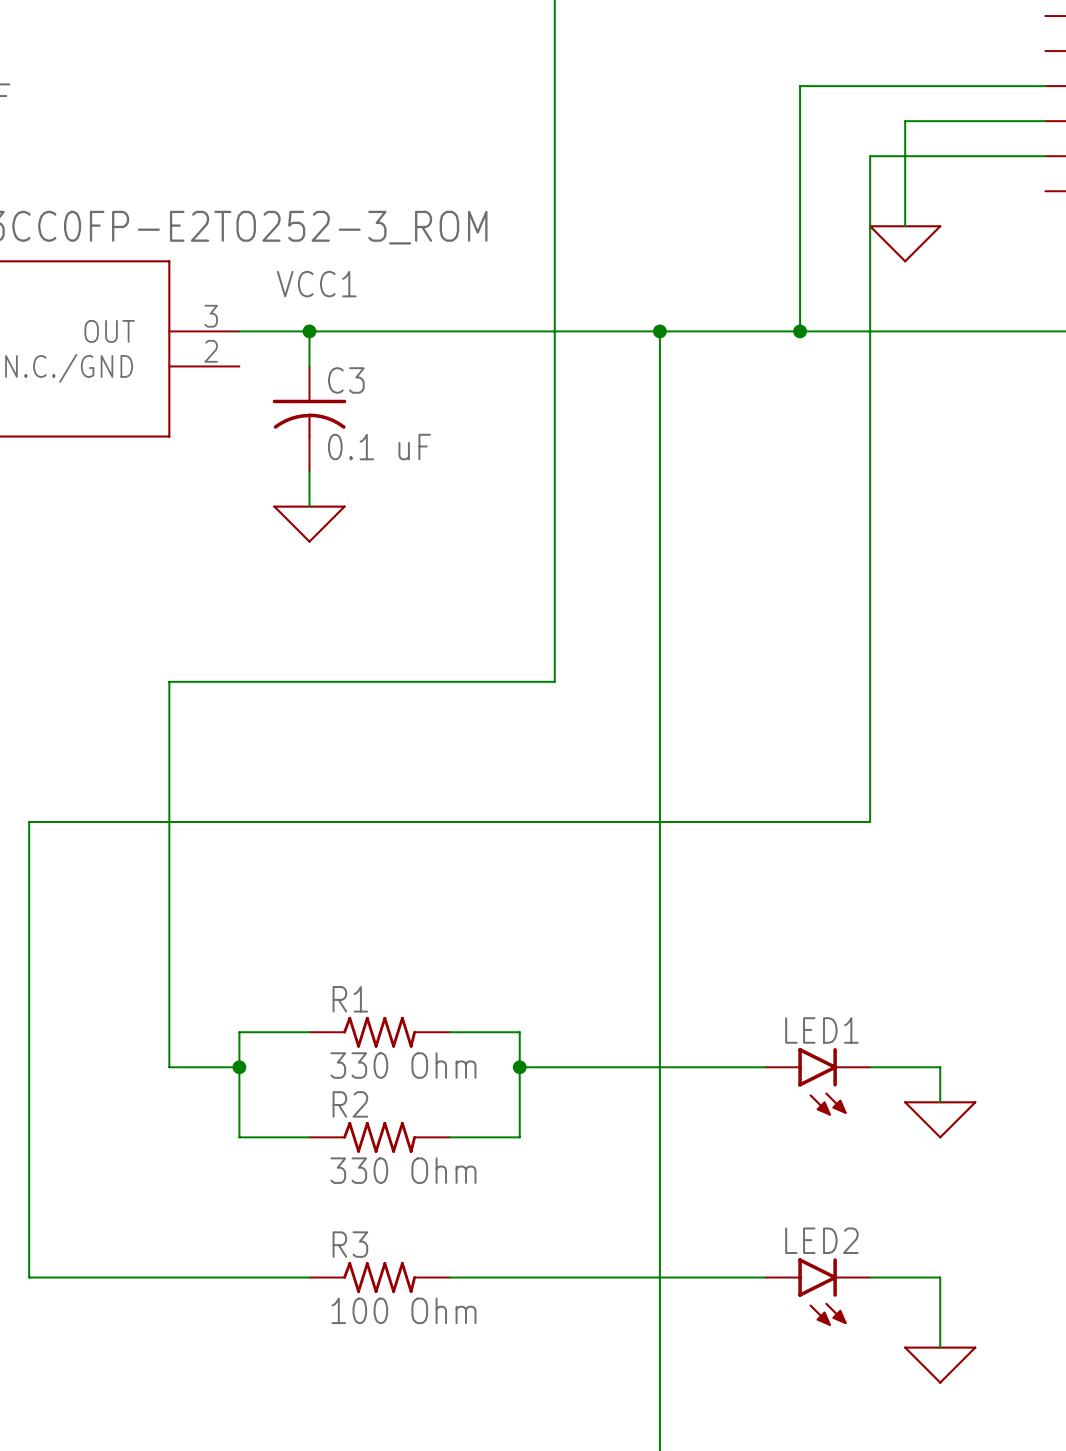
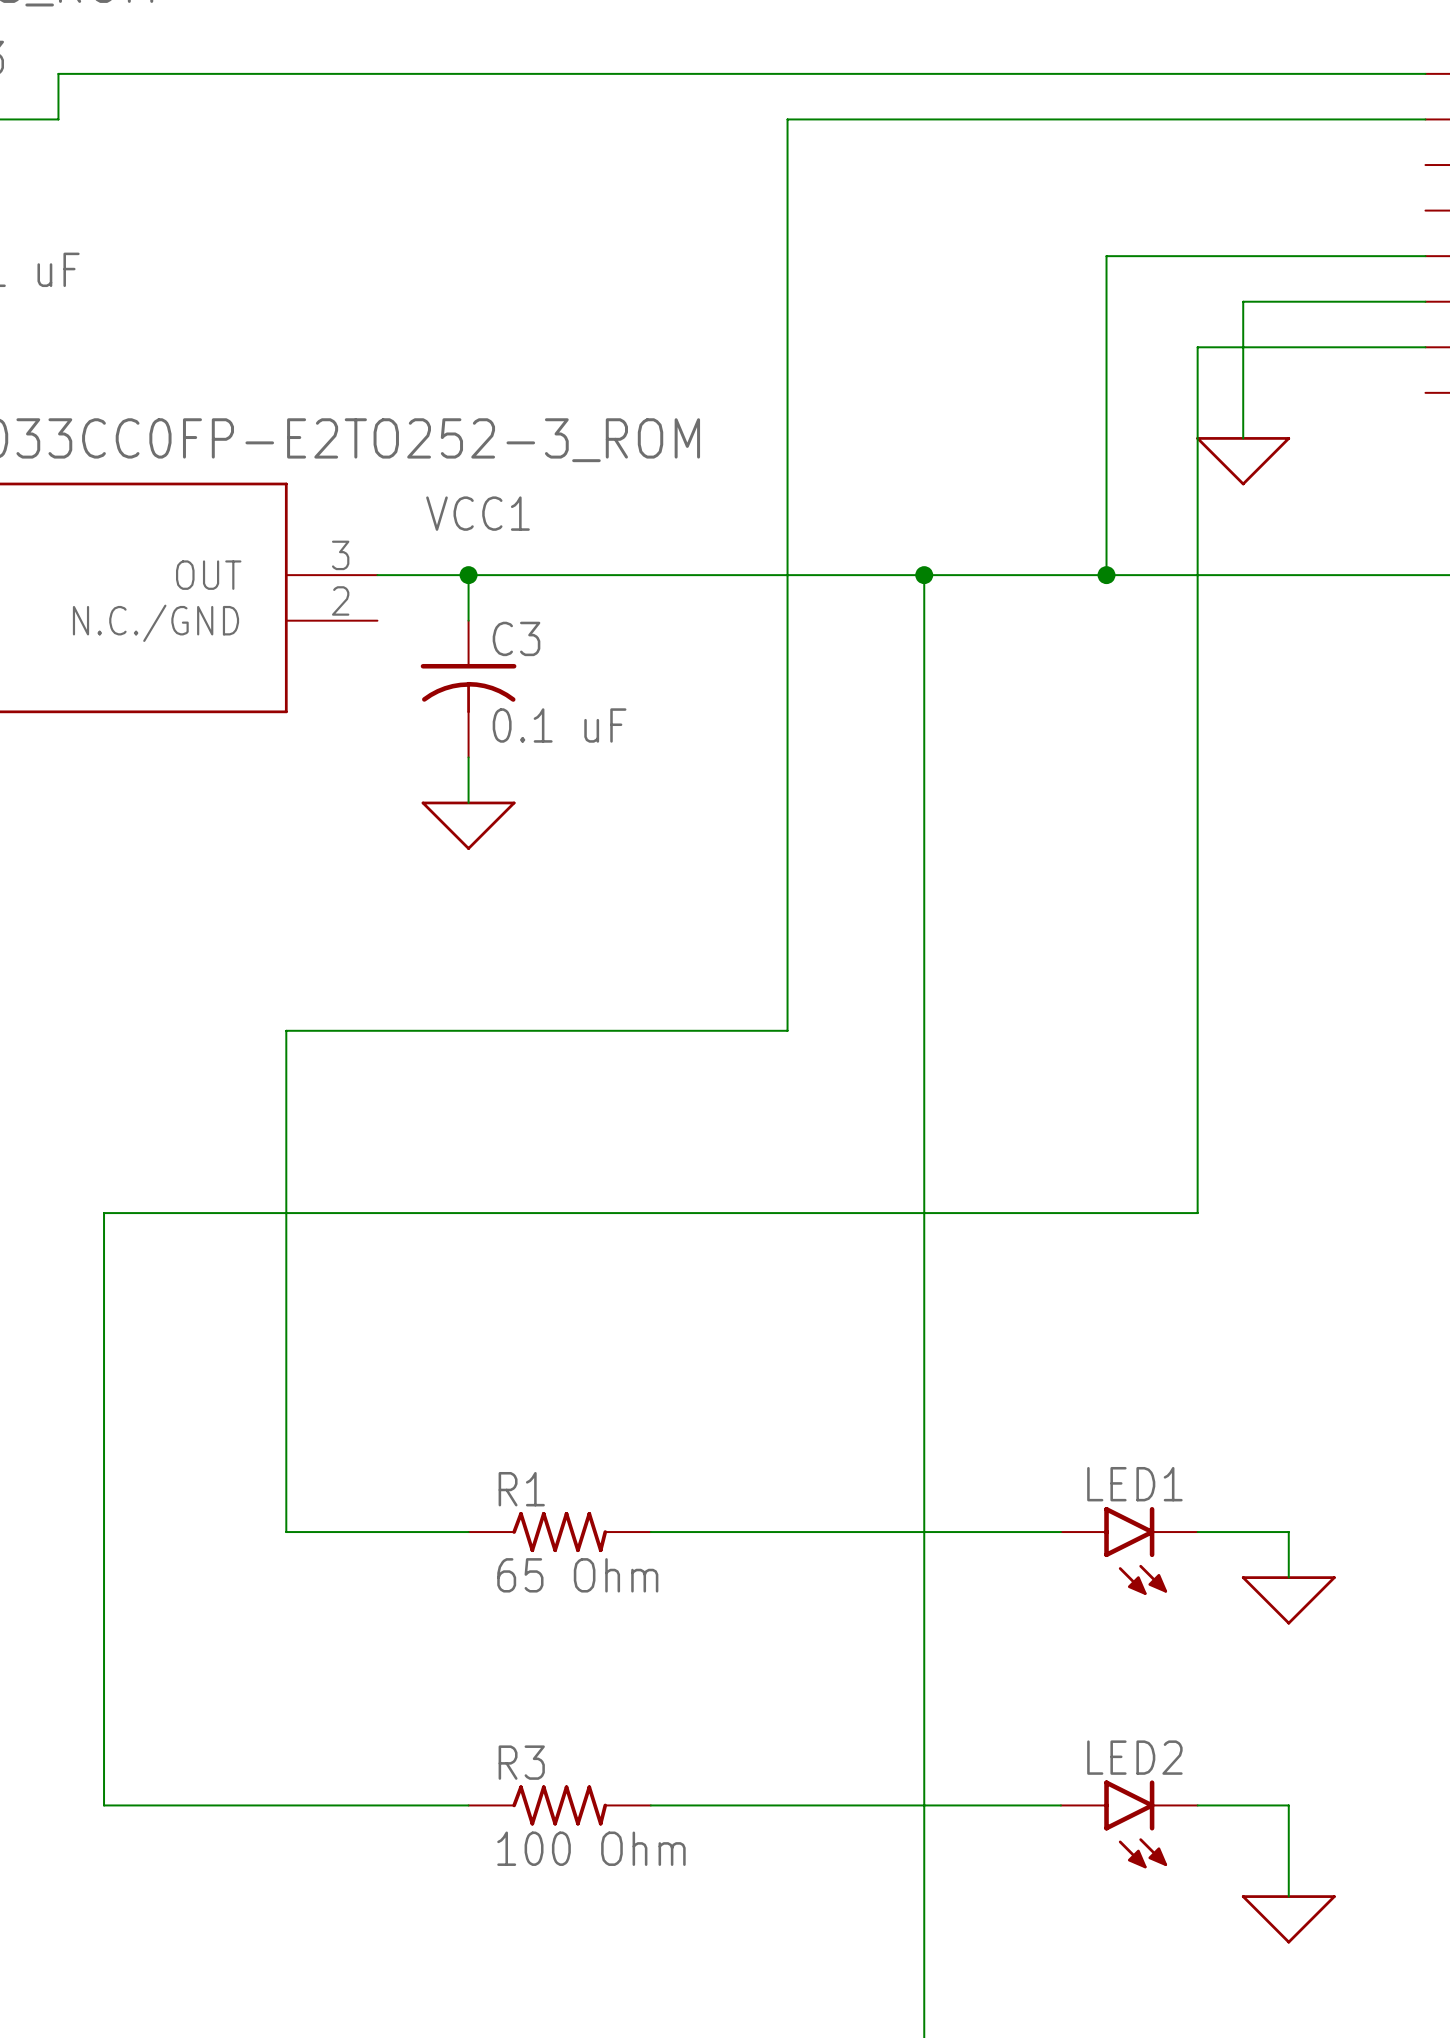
wire: (309, 1032) (239, 1032) (239, 1137) (309, 1137) -> none
R1 position: (379, 1032) -> (559, 1532)
wire: (449, 1032) (519, 1032) (519, 1137) (449, 1137) -> none
R1 value: 330 Ohm (403, 1065) -> 65 Ohm (577, 1575)
wire: none -> (377, 1532) (468, 1532)
junction: (239, 1067) -> none
wire: none -> (650, 1532) (741, 1532)
junction: (519, 1067) -> none
R2: 330 Ohm (379, 1137) -> none

